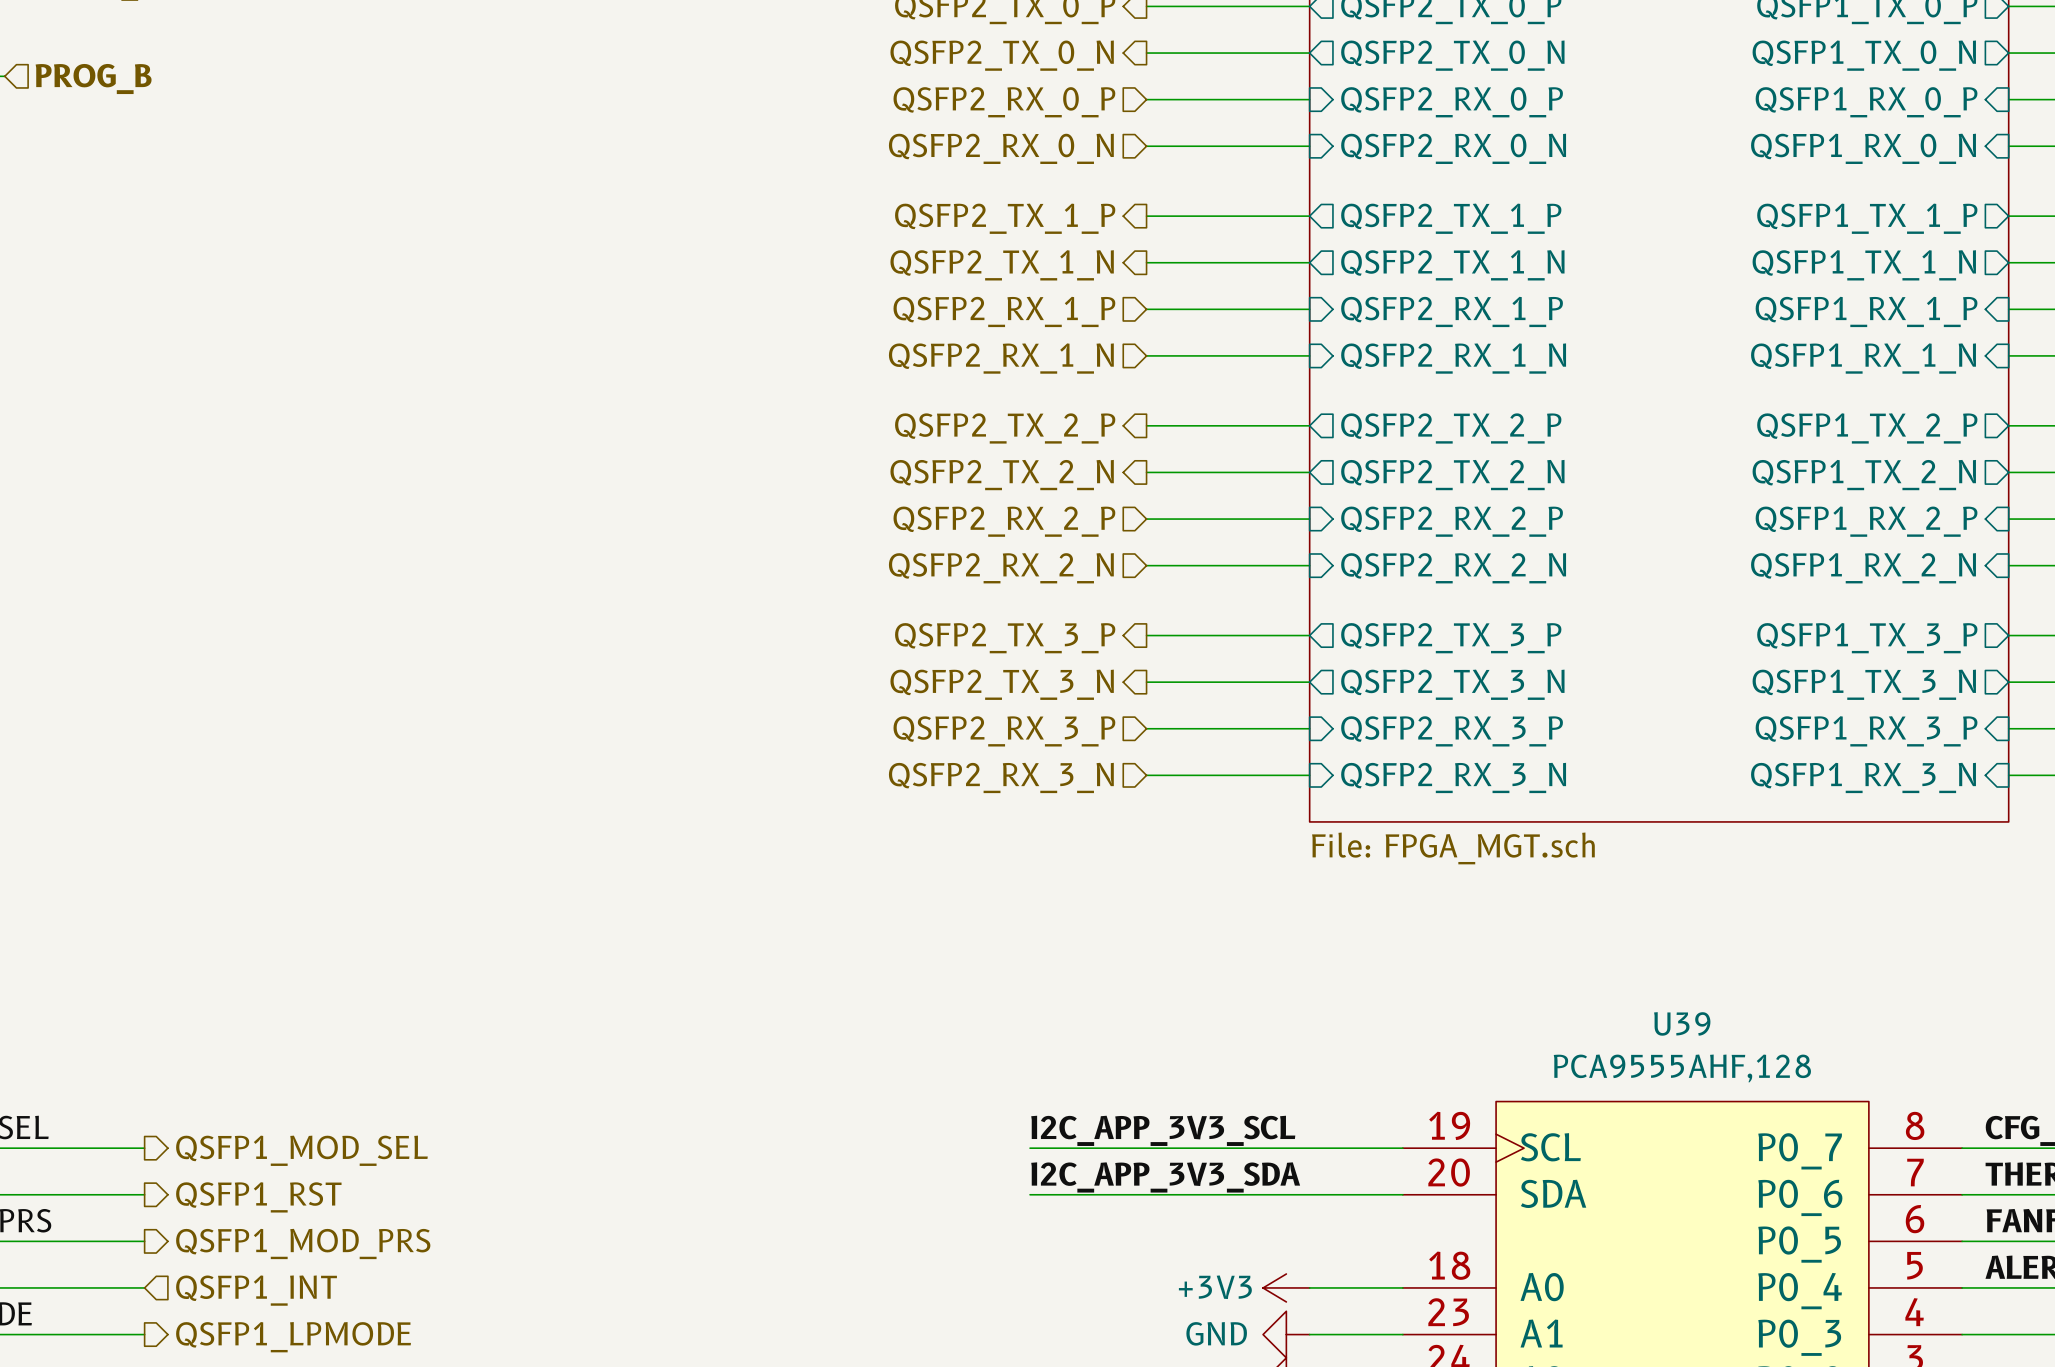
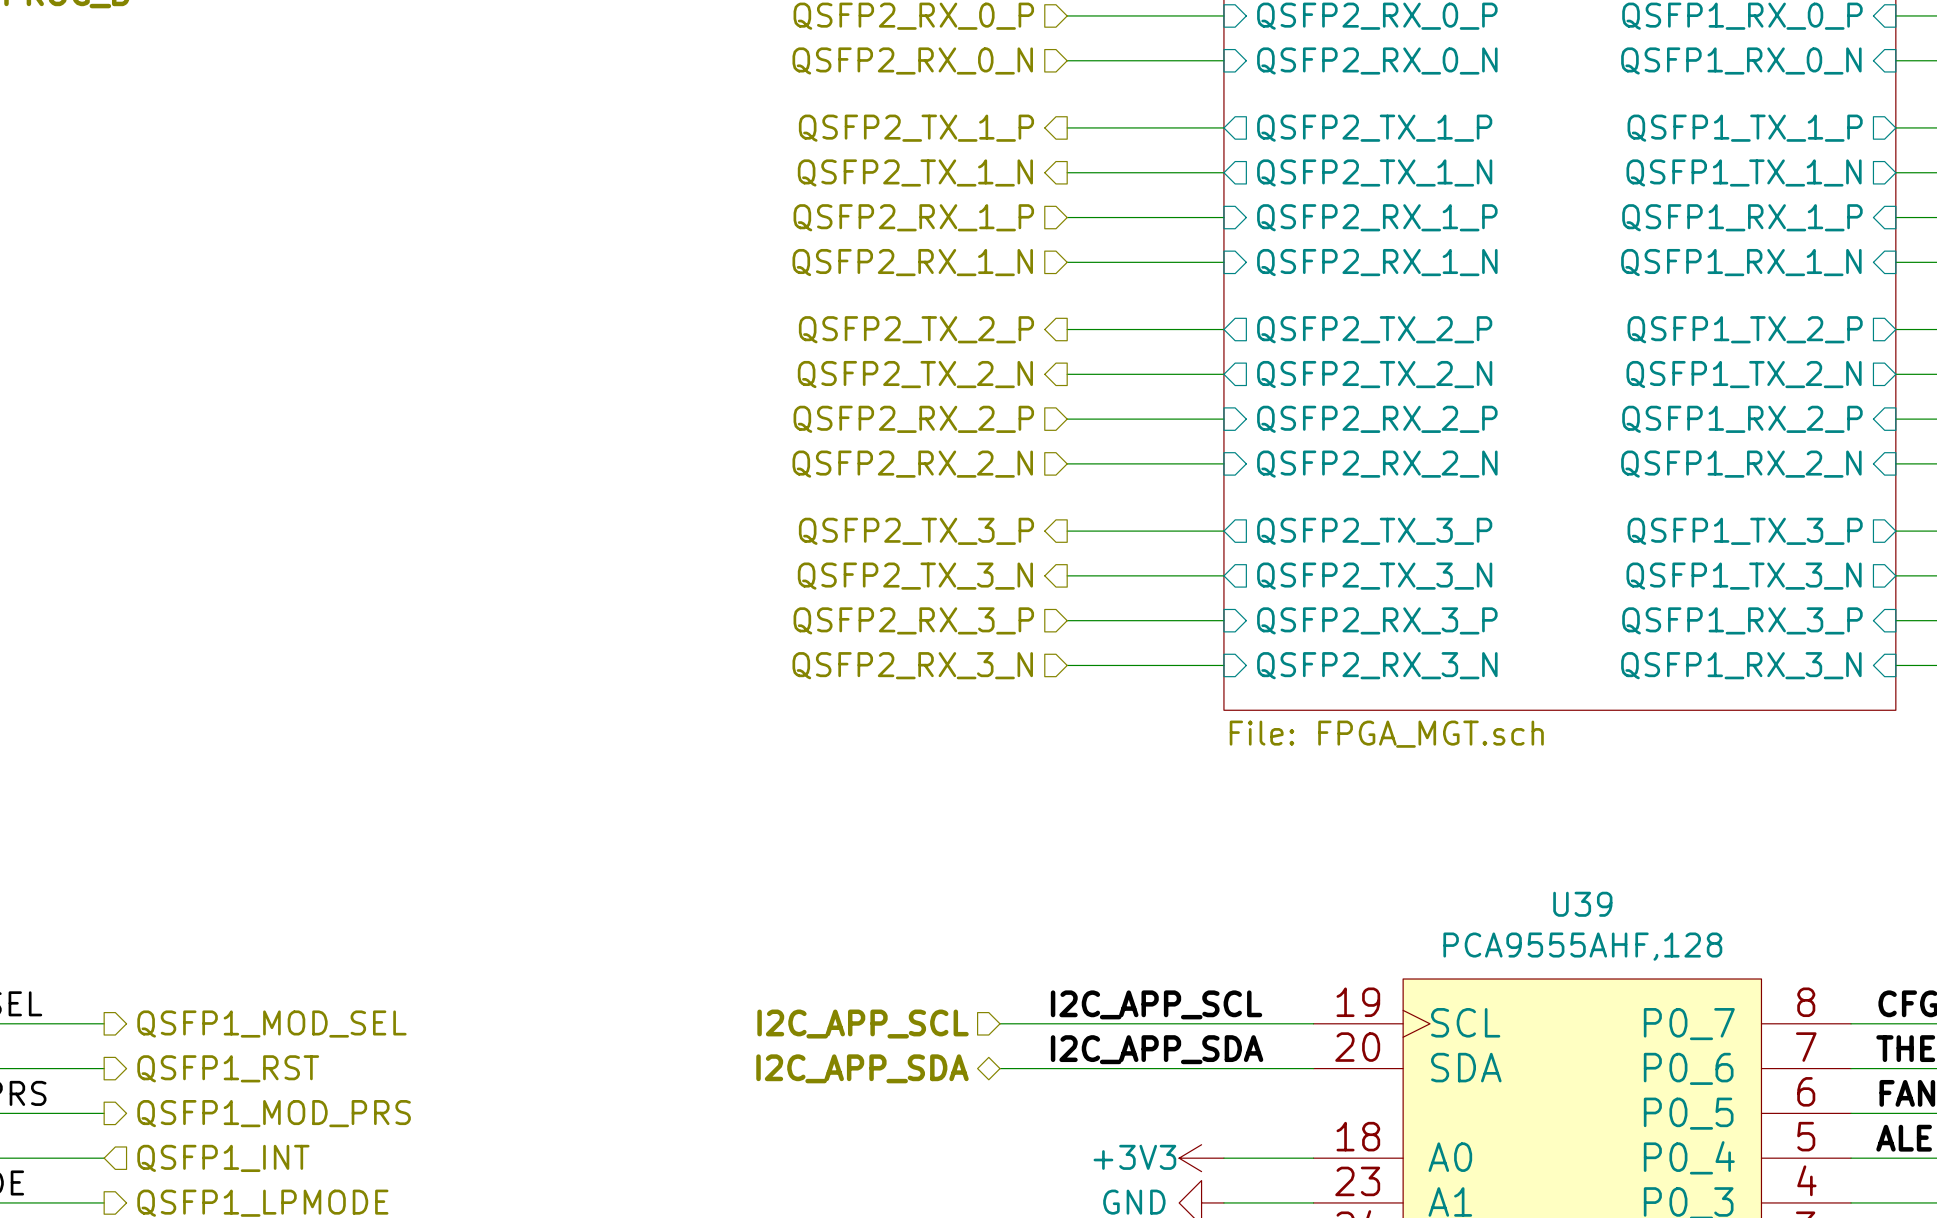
label: I2C_APP_3V3_SCL (1163, 1130) -> none
label: none -> I2C_APP_SCL (1156, 1004)
wire: (1030, 1148) (1076, 1148) -> none
hierarchical label: none -> I2C_APP_SCL (863, 1024)
label: I2C_APP_3V3_SDA (1165, 1177) -> none
label: none -> I2C_APP_SDA (1157, 1049)
wire: (1030, 1194) (1076, 1194) -> none
hierarchical label: none -> I2C_APP_SDA (862, 1068)

